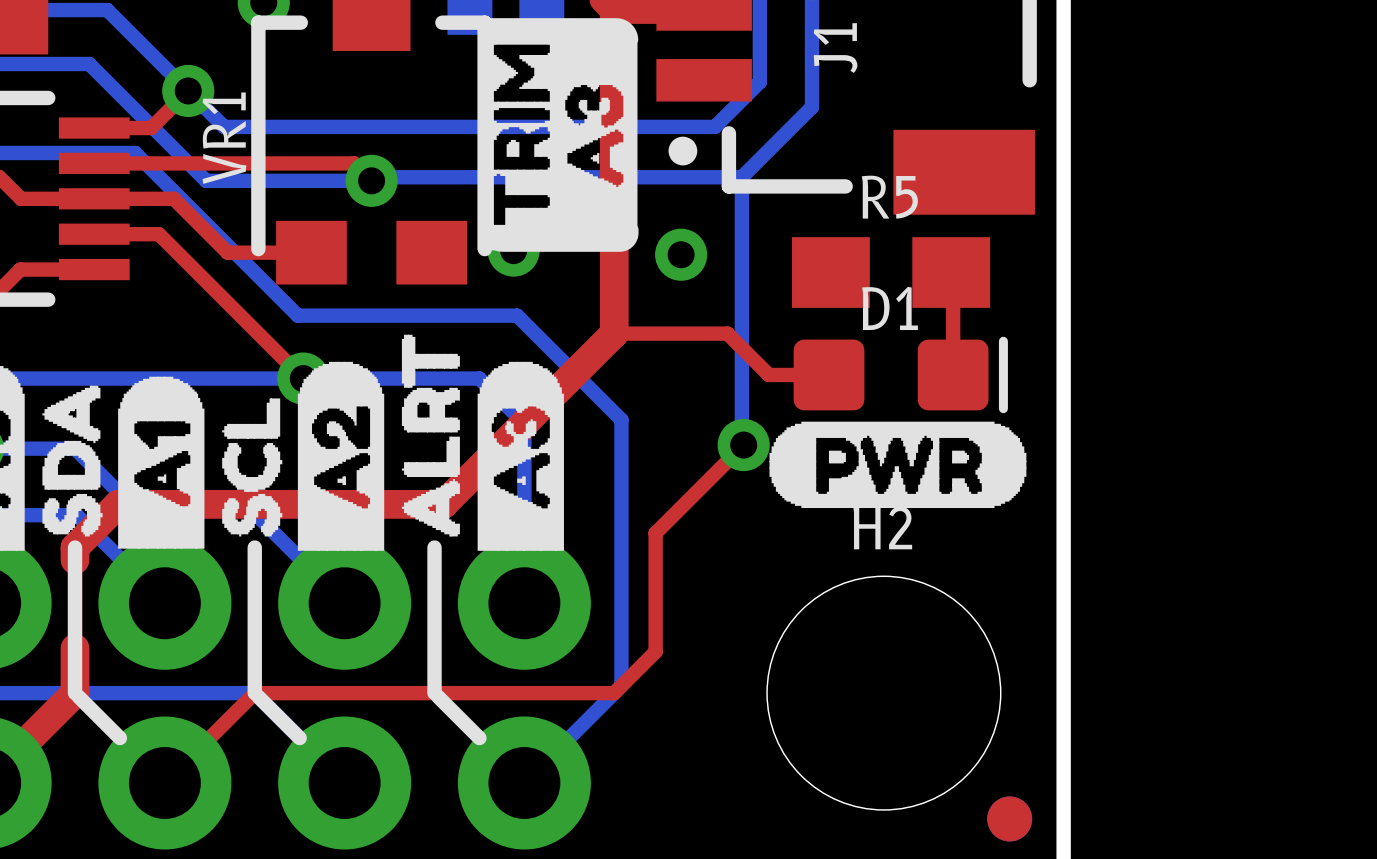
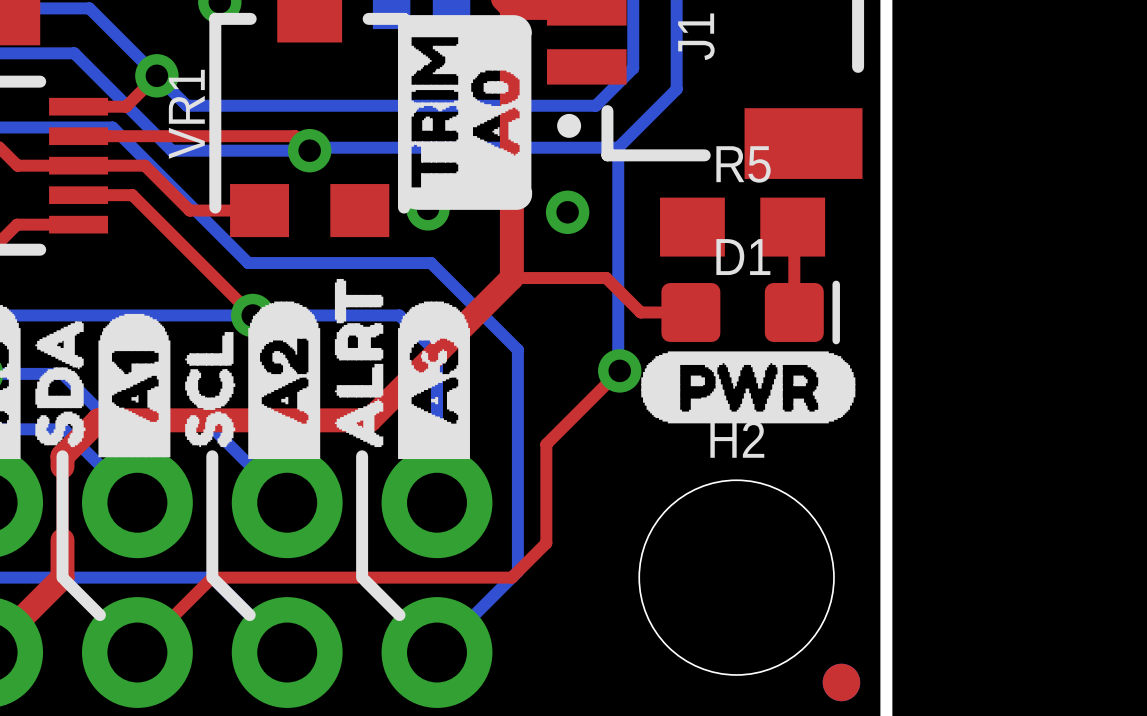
drawing shape: [551, 42, 638, 228] -> [459, 35, 532, 190]

